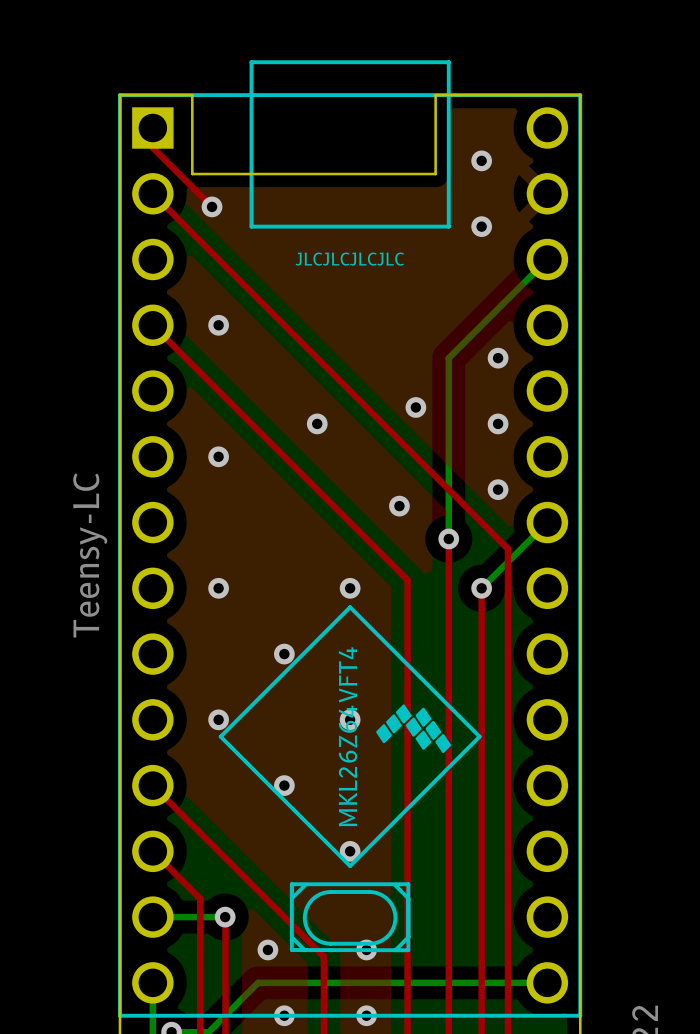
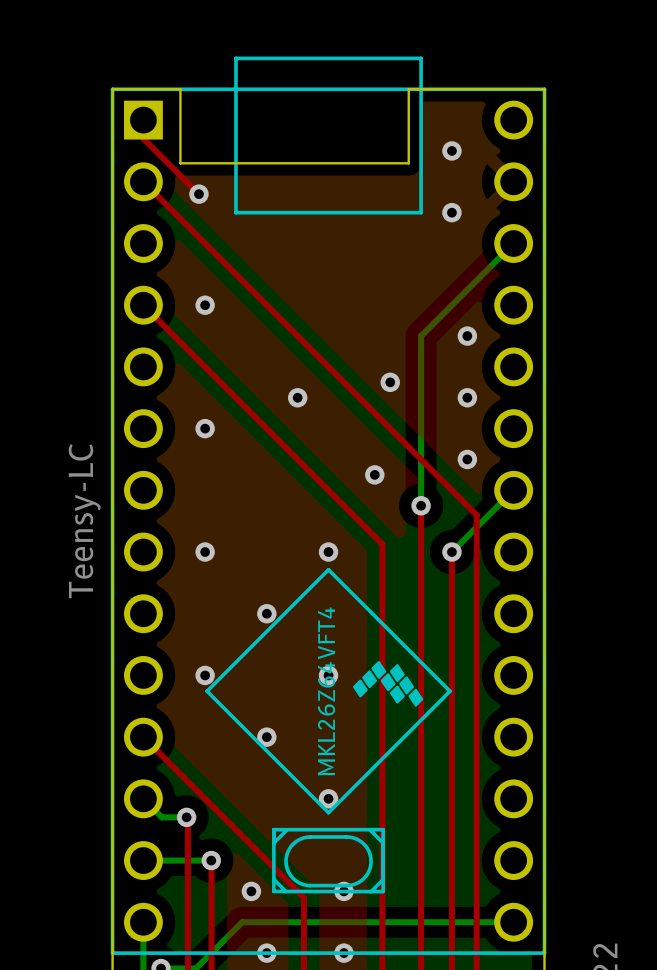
text: JLCJLCJLCJLC (349, 259) -> none
top track: (152, 851) (200, 898) -> (186, 817) (187, 843)
bottom track: none -> (143, 798) (161, 817) (186, 817)
via: none -> (186, 817)

